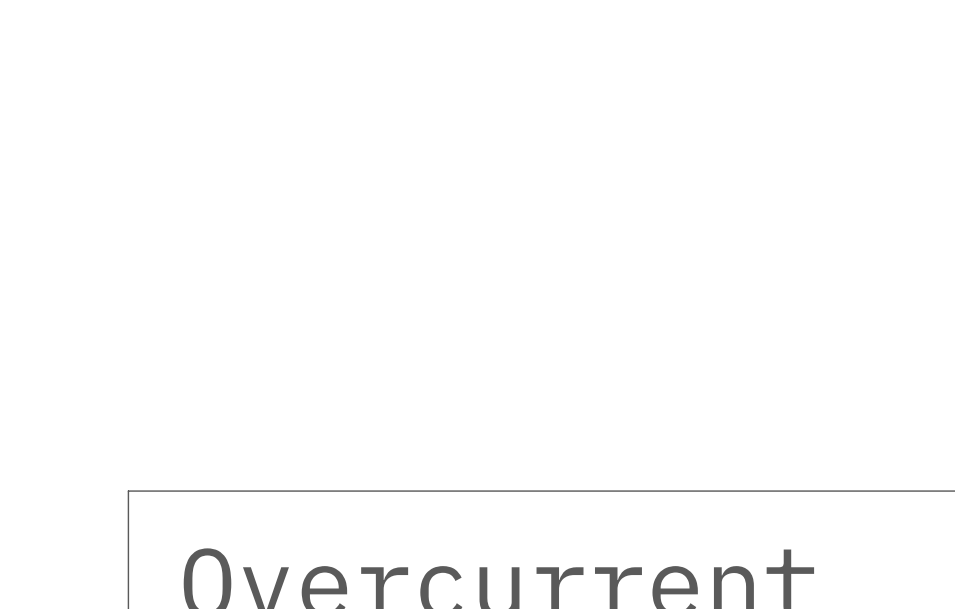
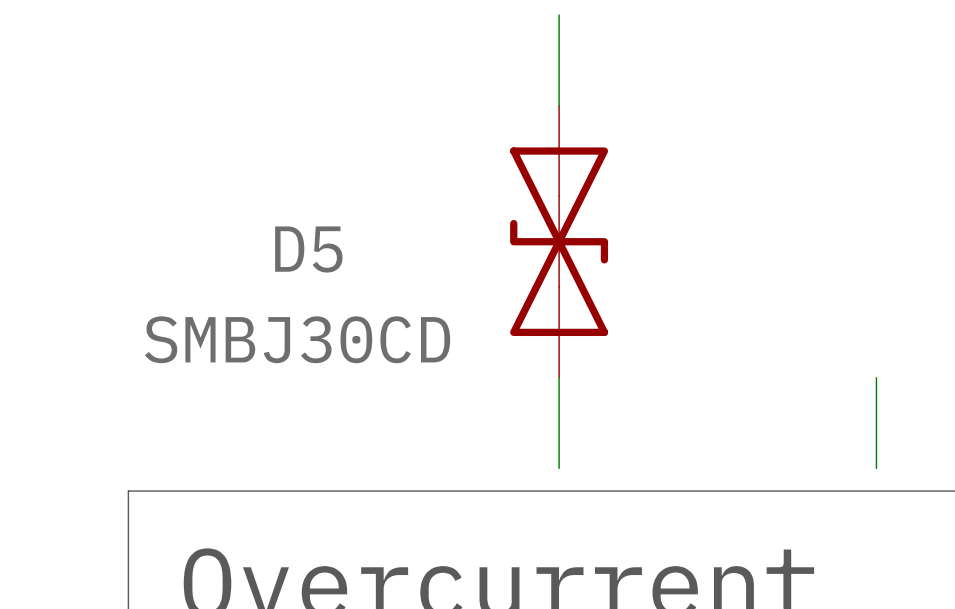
wire: none -> (559, 15) (559, 105)
D5: none -> SMBJ30CD (559, 241)
wire: none -> (559, 377) (559, 468)
wire: none -> (876, 377) (876, 468)

